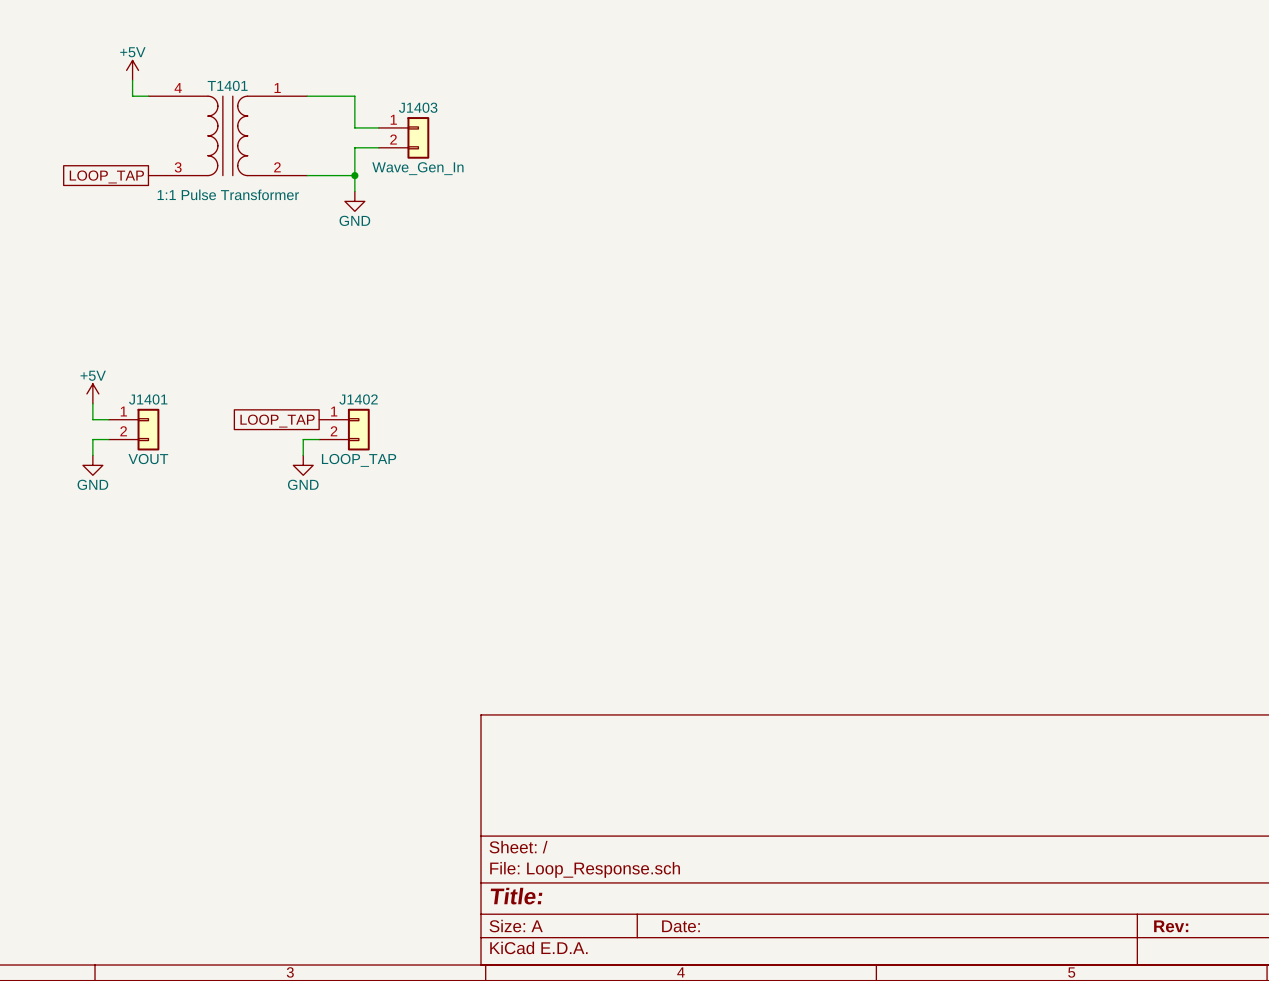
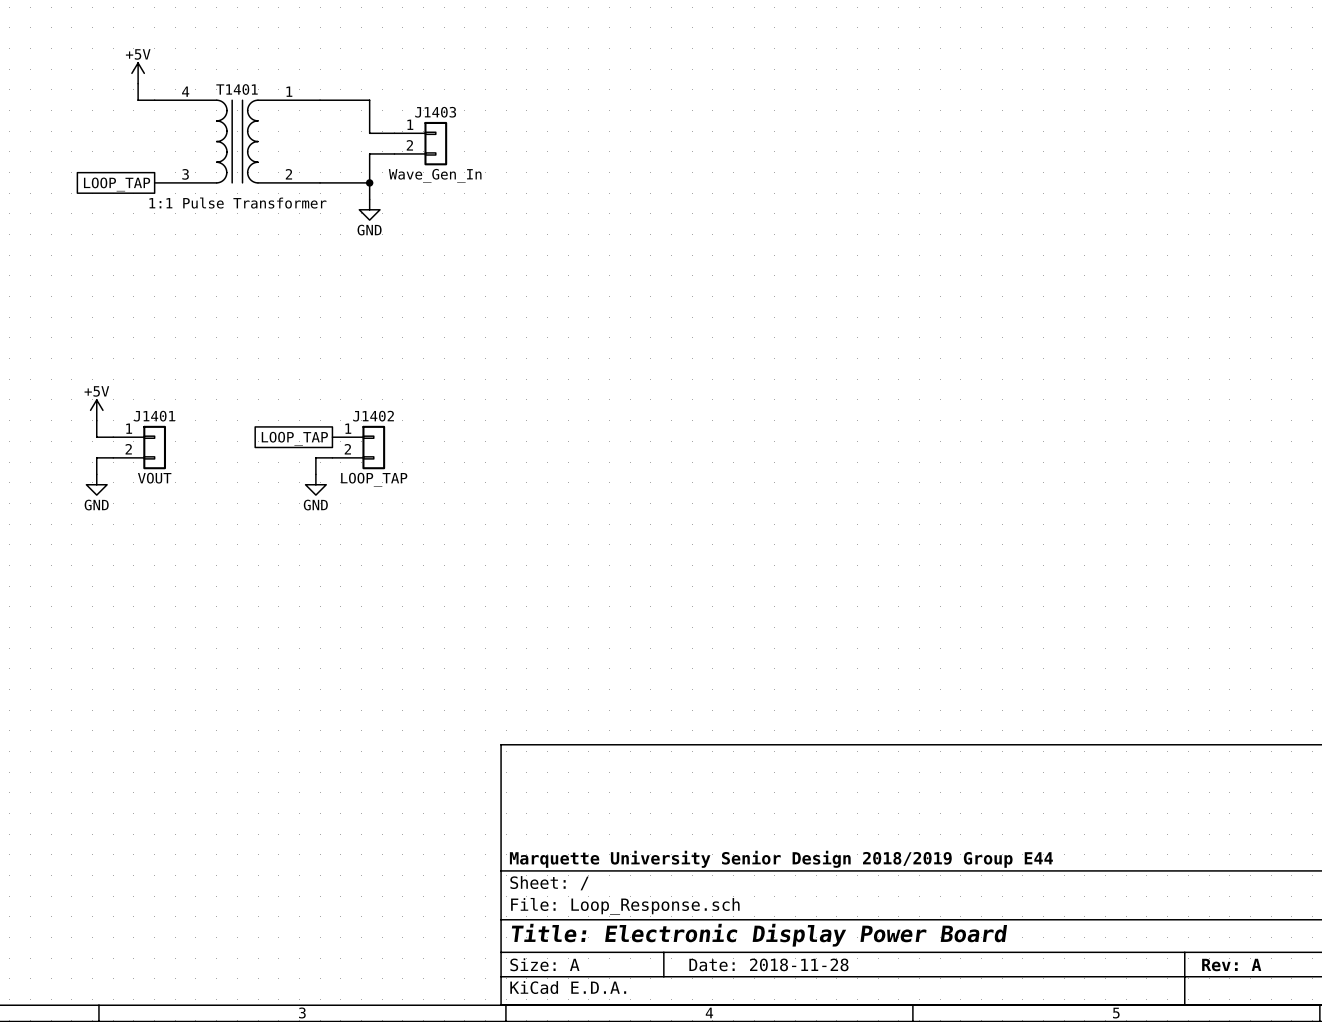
title block: none -> Marquette University Senior Design 2018/2019 Group E44 (781, 859)
title block: Title: (516, 896) -> Title: Electronic Display Power Board (759, 935)
title block: Date: (680, 926) -> Date: 2018-11-28 (768, 964)
title block: Rev: (1171, 926) -> Rev: A (1231, 965)

